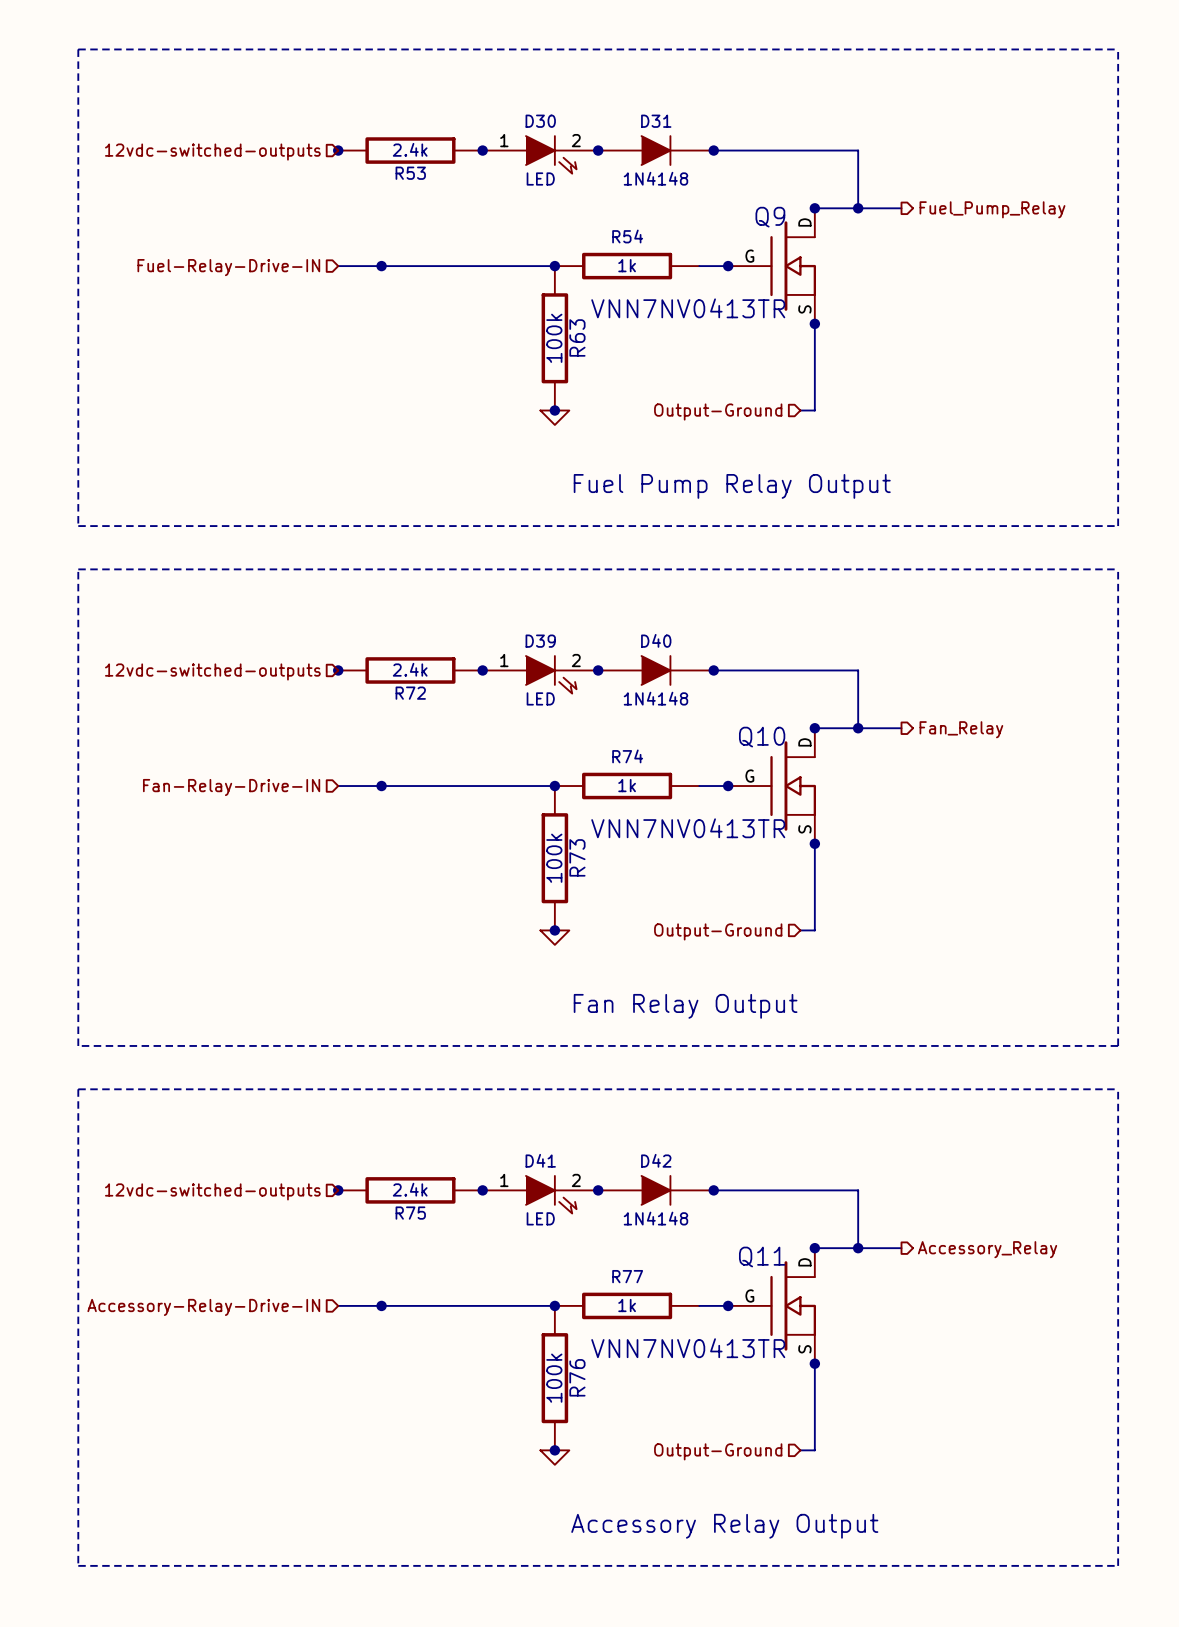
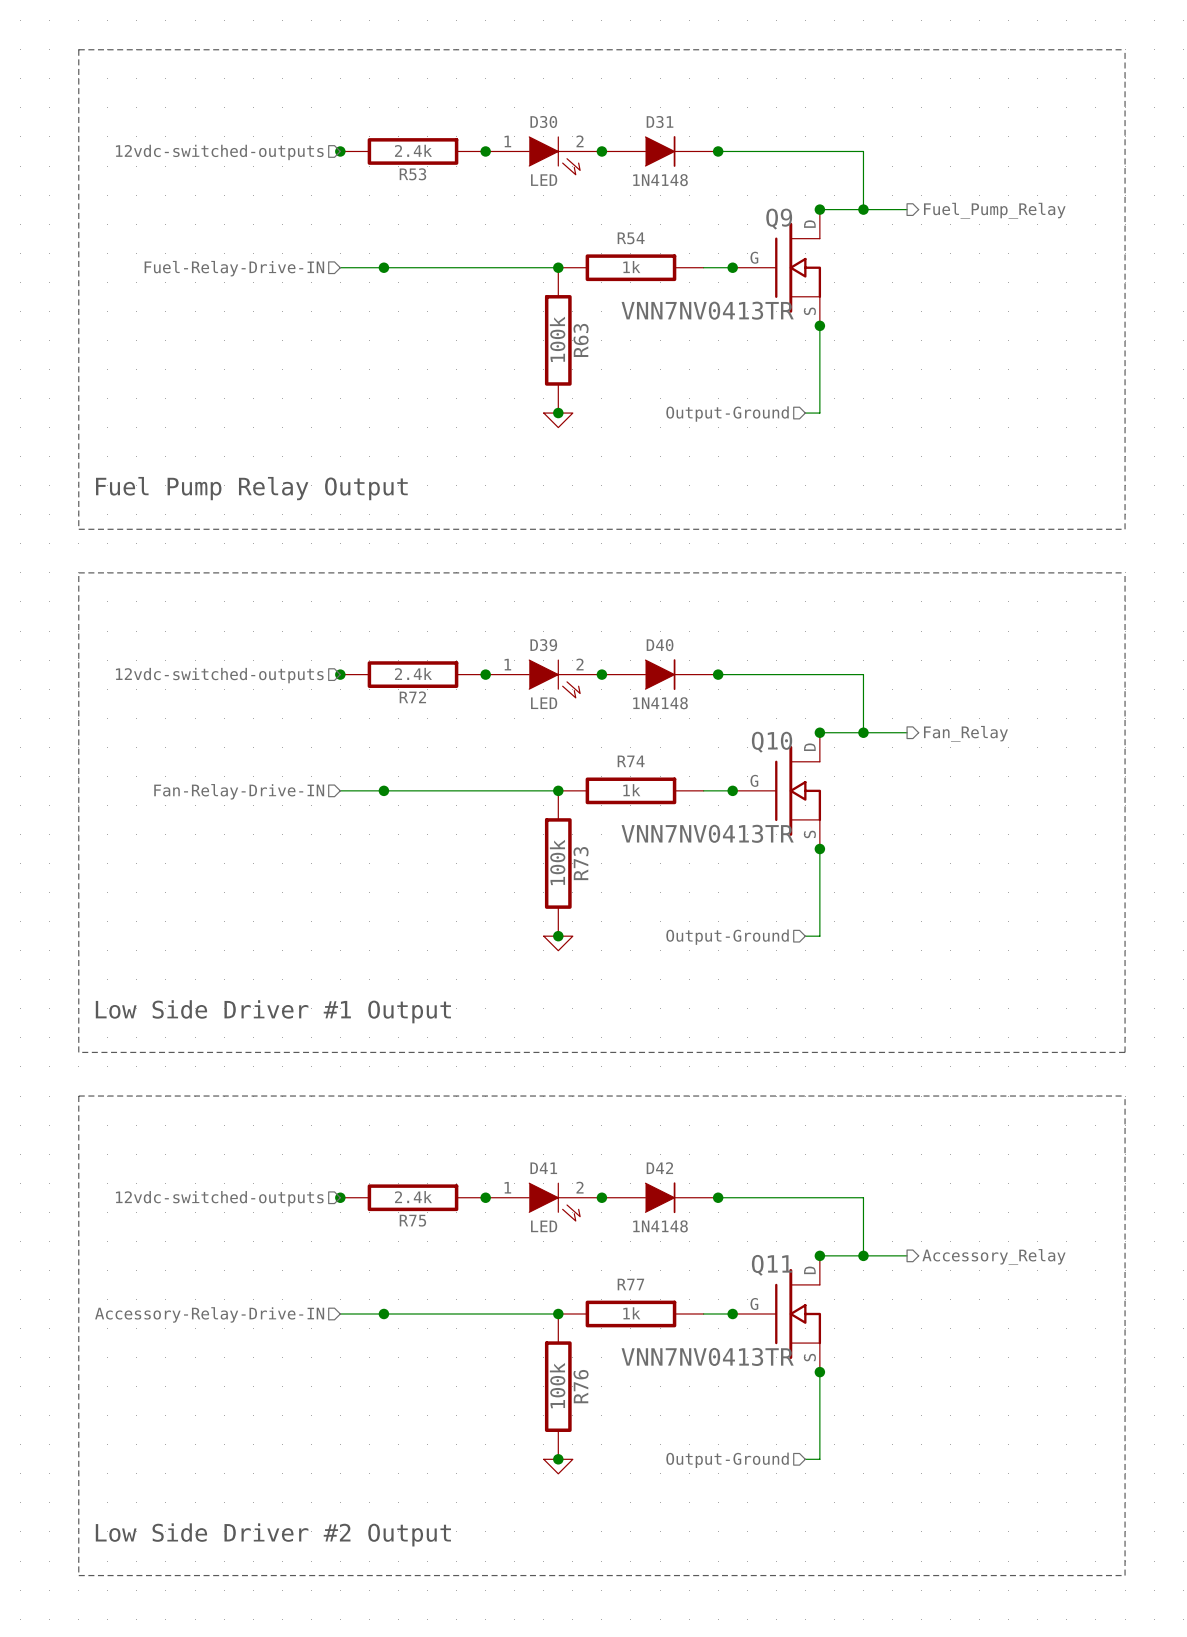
text: none -> Fuel Pump Relay Output (251, 488)
text: Fuel Pump Relay Output (732, 486) -> none
text: none -> Low Side Driver #1 Output (273, 1011)
text: Fan Relay Output (685, 1006) -> none
text: none -> Low Side Driver #2 Output (273, 1534)
text: Accessory Relay Output (724, 1526) -> none

